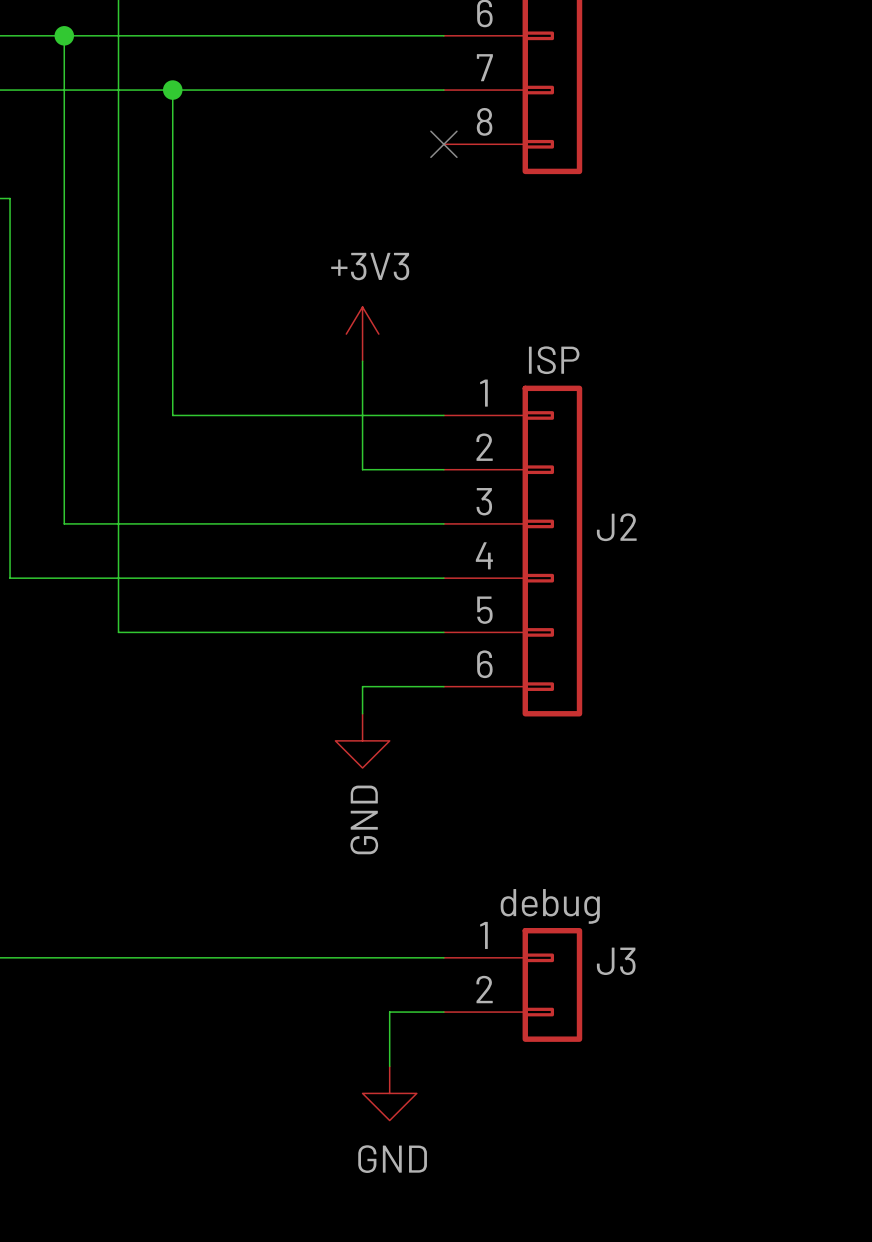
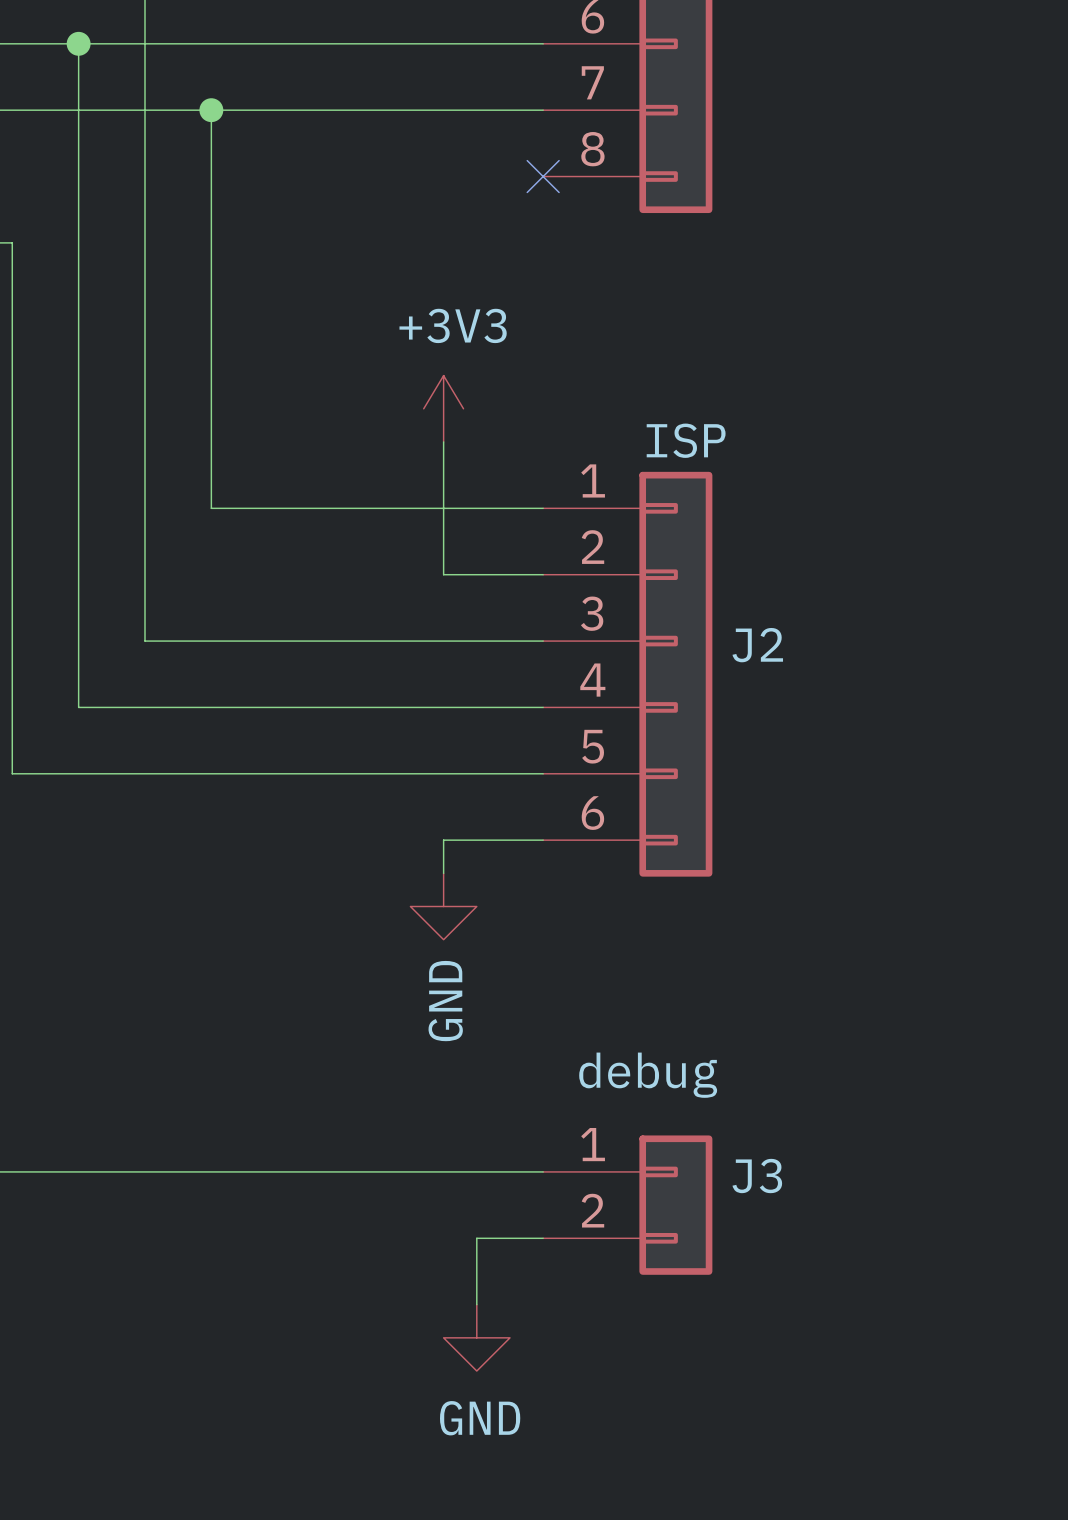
wire: (64, 523) (118, 523) (118, 632) -> (12, 707) (12, 773) (145, 773)
wire: (10, 578) (64, 578) -> (78, 641) (78, 707)
J3 value position: debug (550, 906) -> debug (648, 1075)

